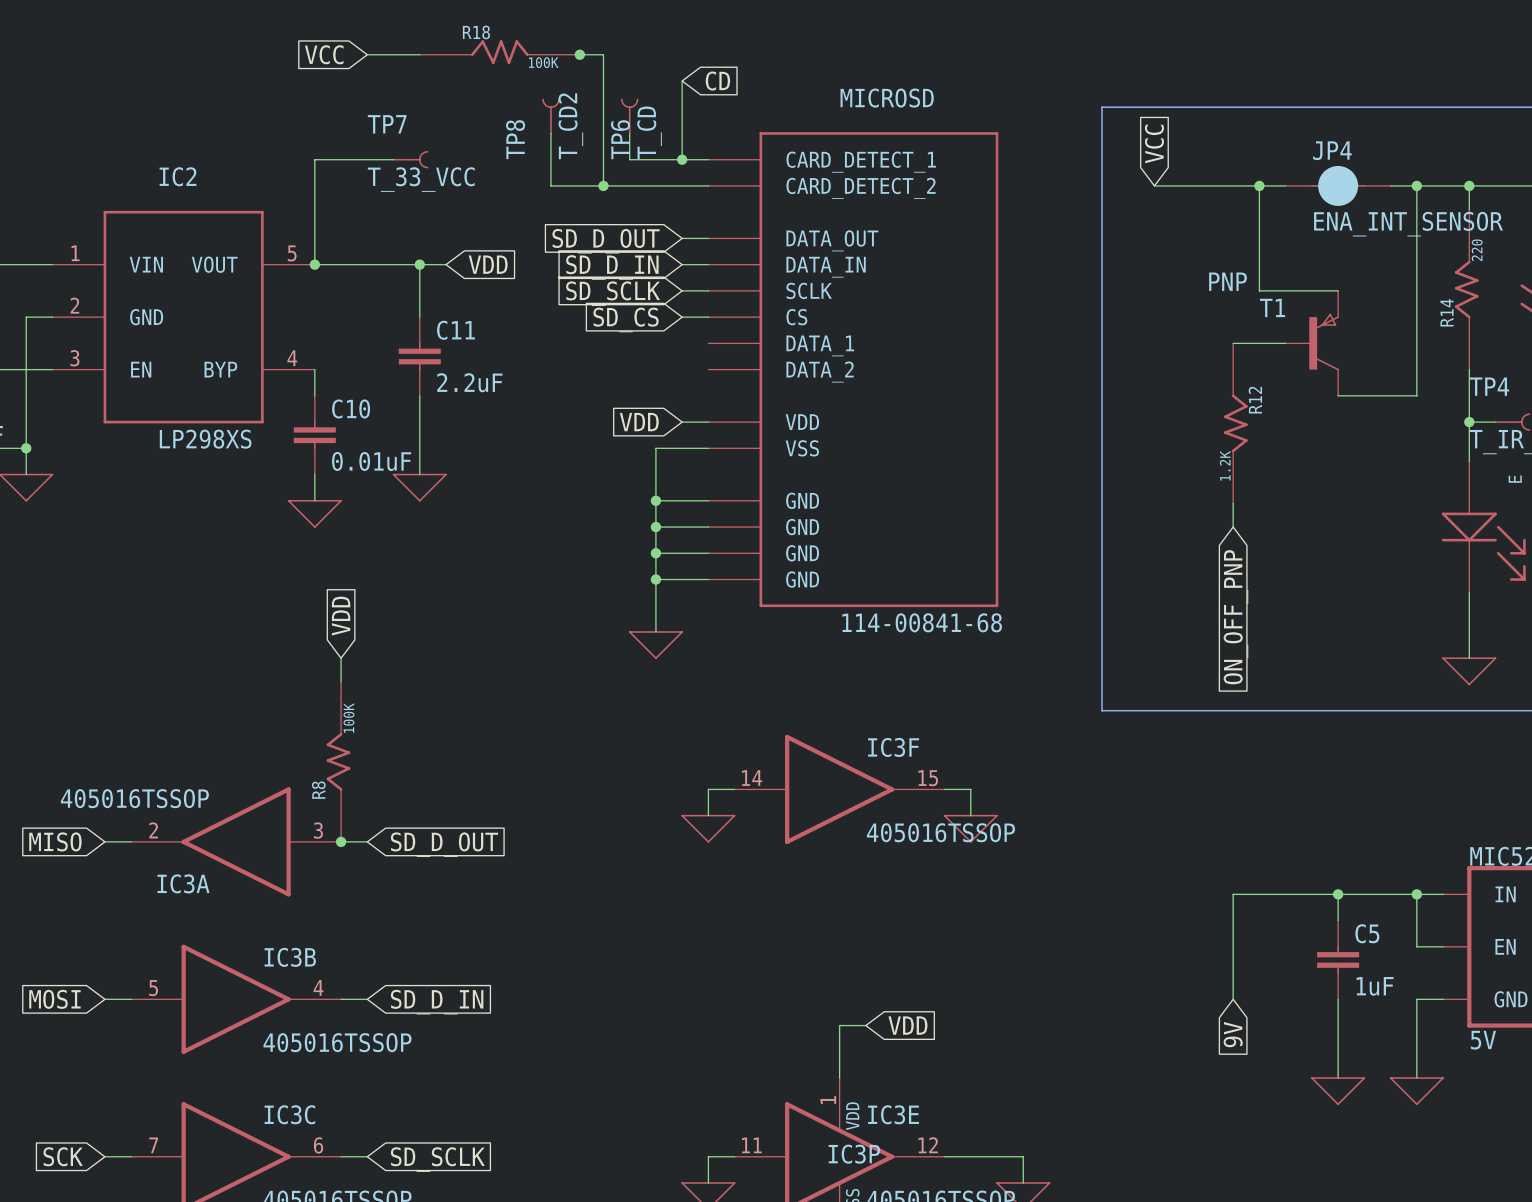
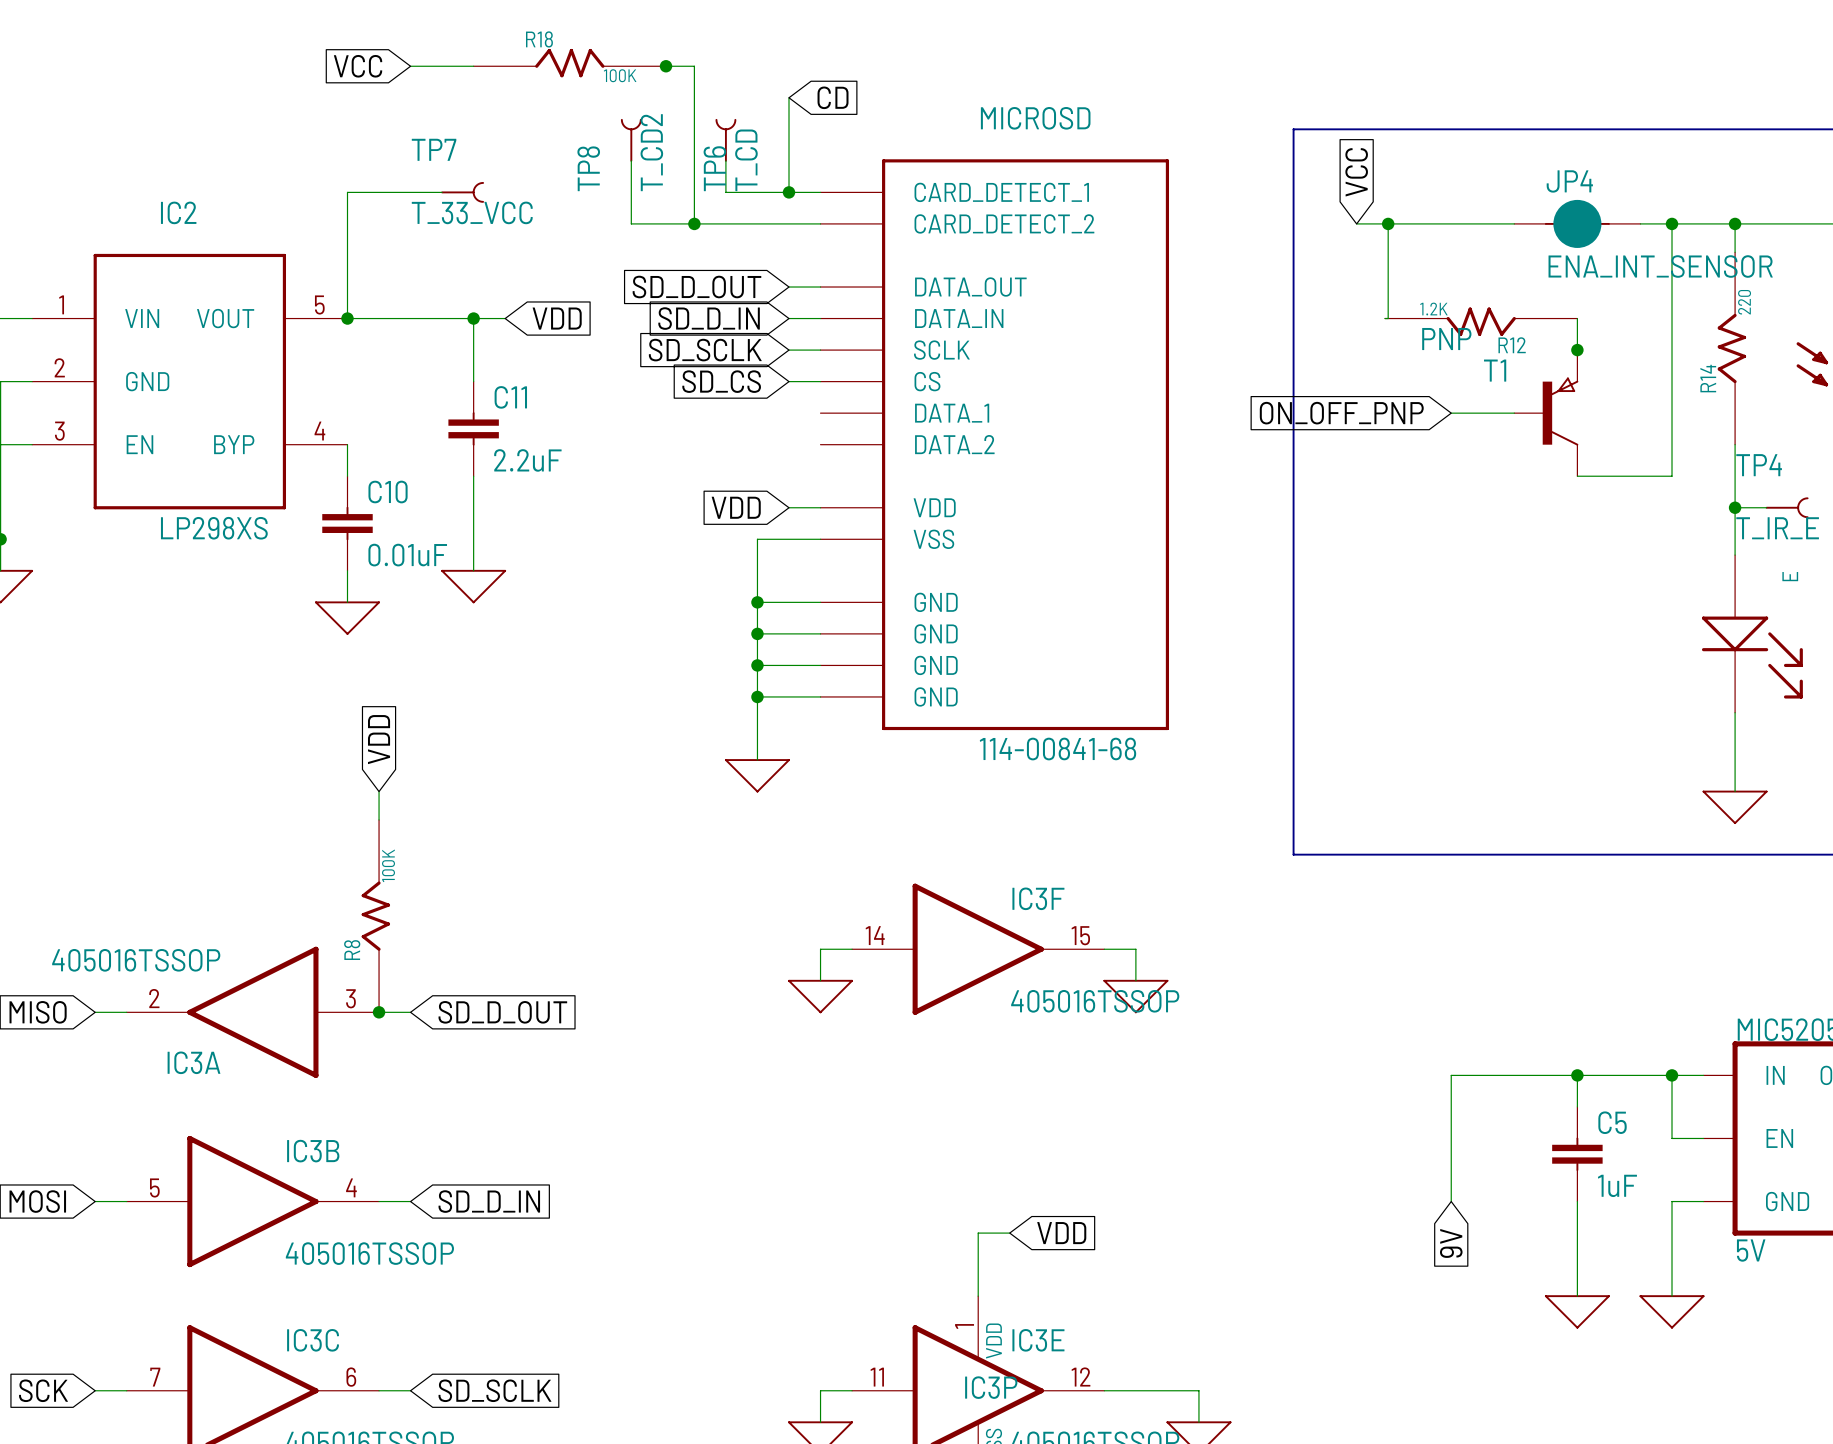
wire: none -> (1388, 223) (1388, 318) (1385, 318)
junction: none -> (1388, 223)
wire: (1259, 185) (1259, 290) (1338, 290) -> none
junction: (1259, 185) -> none
wire: none -> (1577, 318) (1577, 350) (1580, 350)
junction: none -> (1577, 350)
R12 rotation: 0° (1235, 423) -> 90° clockwise (1481, 321)
R12 position: (1235, 423) -> (1481, 321)
wire: (1233, 503) (1233, 527) -> none
global label rotation: 0° (1235, 617) -> 90° clockwise (1341, 413)
global label position: ON_OFF_PNP (1235, 617) -> ON_OFF_PNP (1341, 413)

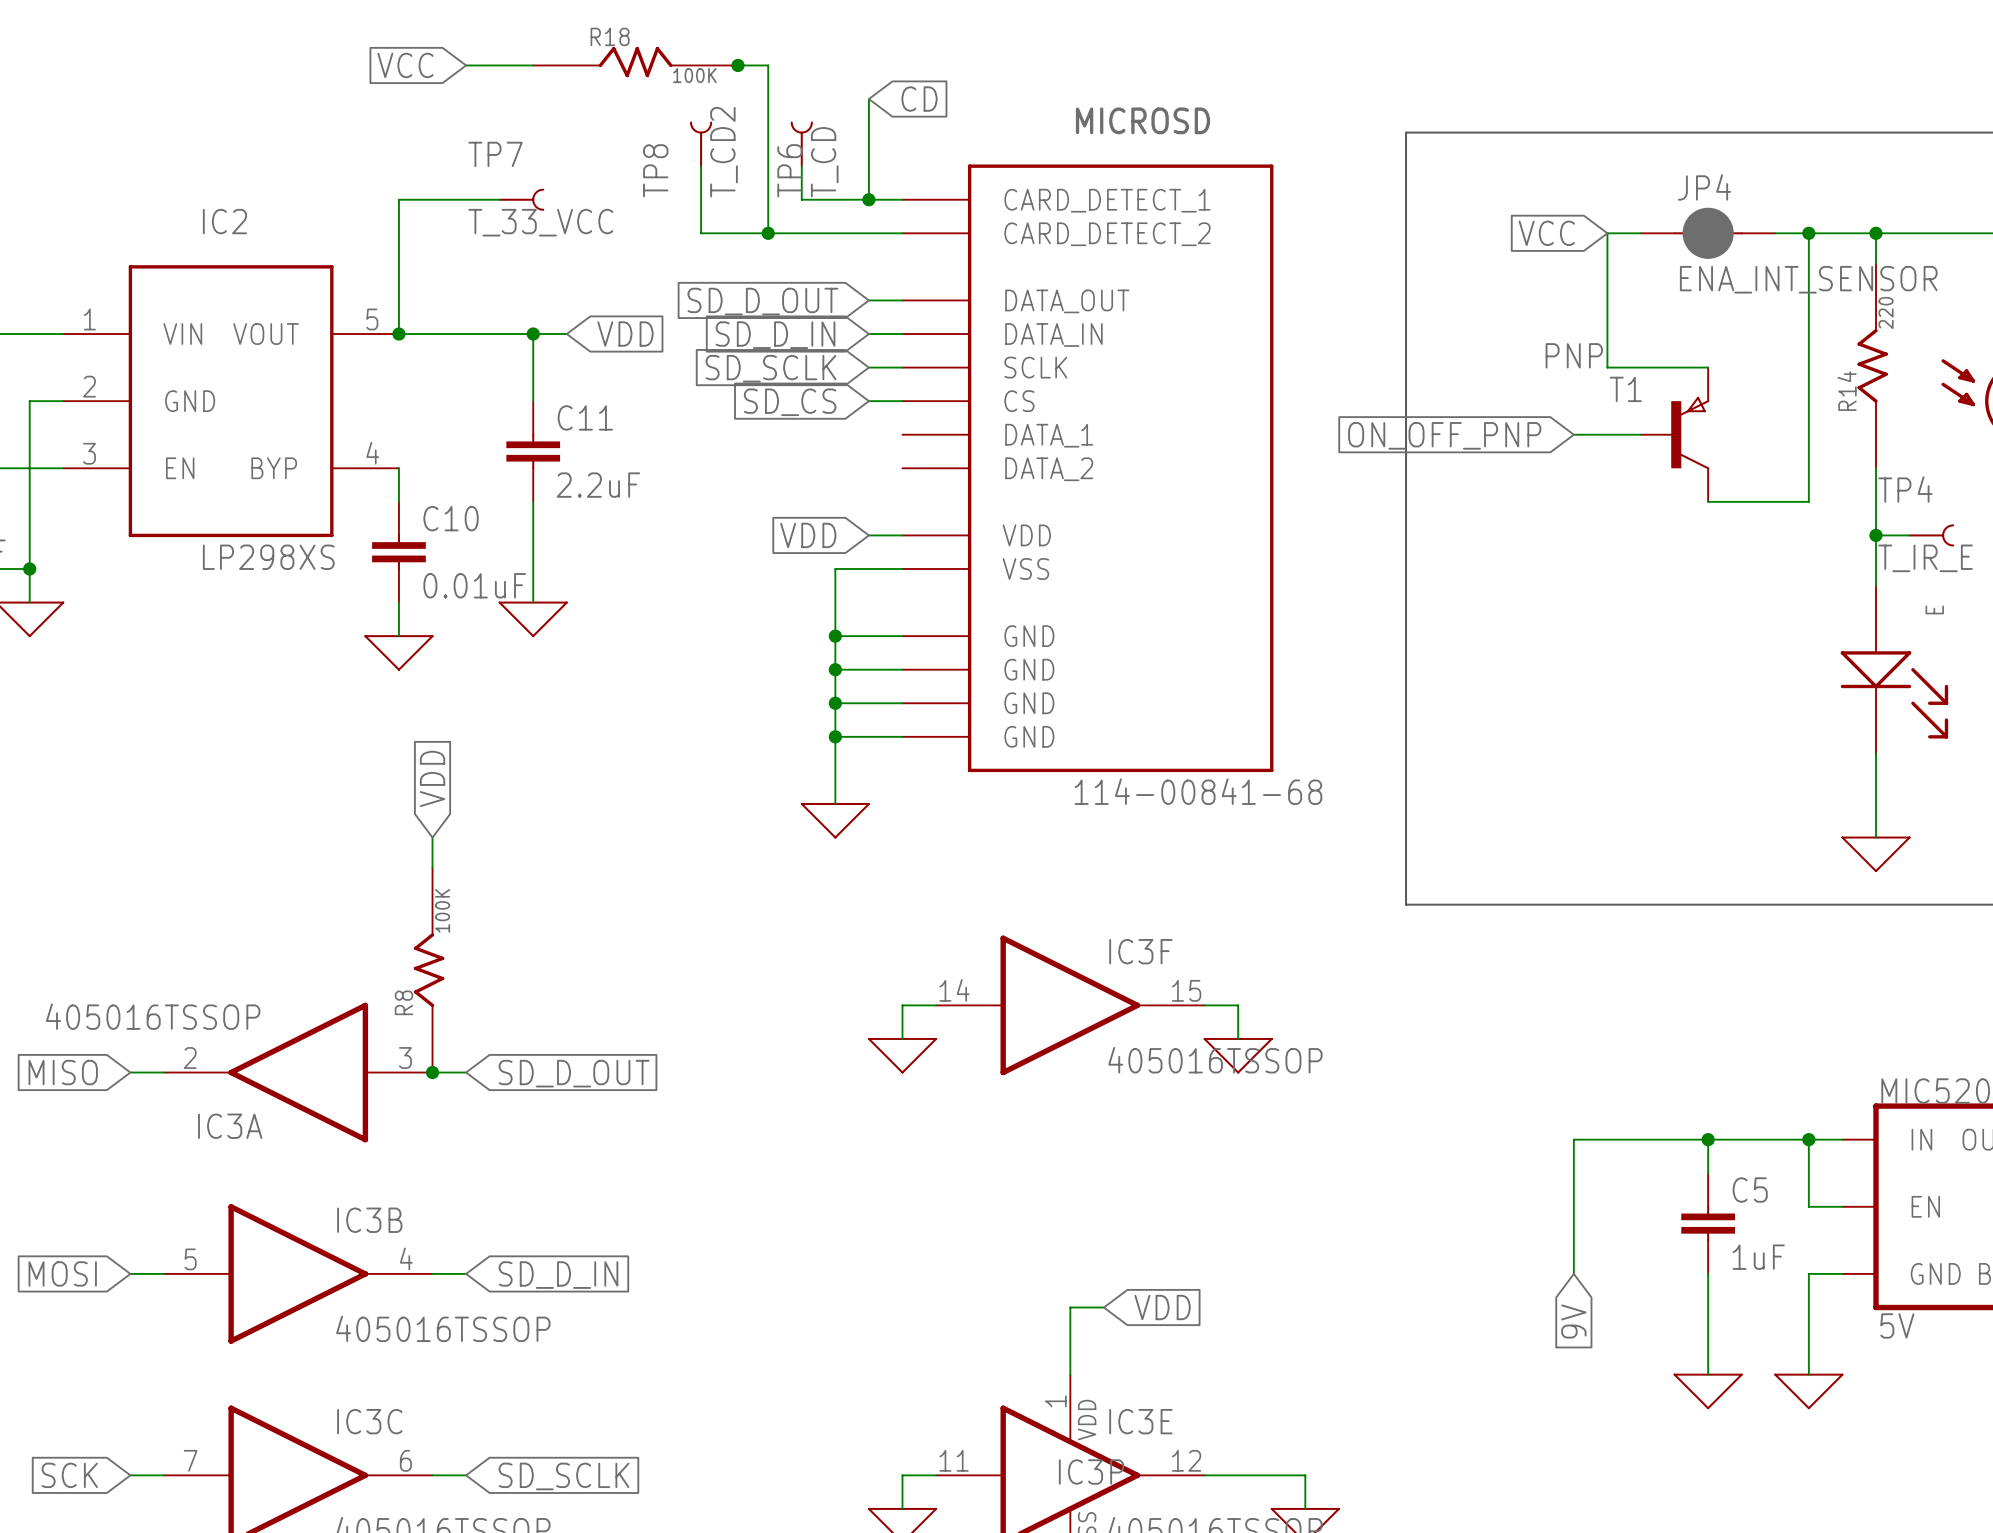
global label rotation: 0° (1356, 172) -> 90° counterclockwise (1546, 233)
wire: (1356, 223) (1482, 223) -> (1708, 367) (1607, 367) (1607, 233)
wire: (1388, 223) (1388, 318) (1385, 318) -> none
junction: (1388, 223) -> none
wire: (1577, 318) (1577, 350) (1580, 350) -> none
R12: 1.2K (1481, 321) -> none
junction: (1577, 350) -> none

